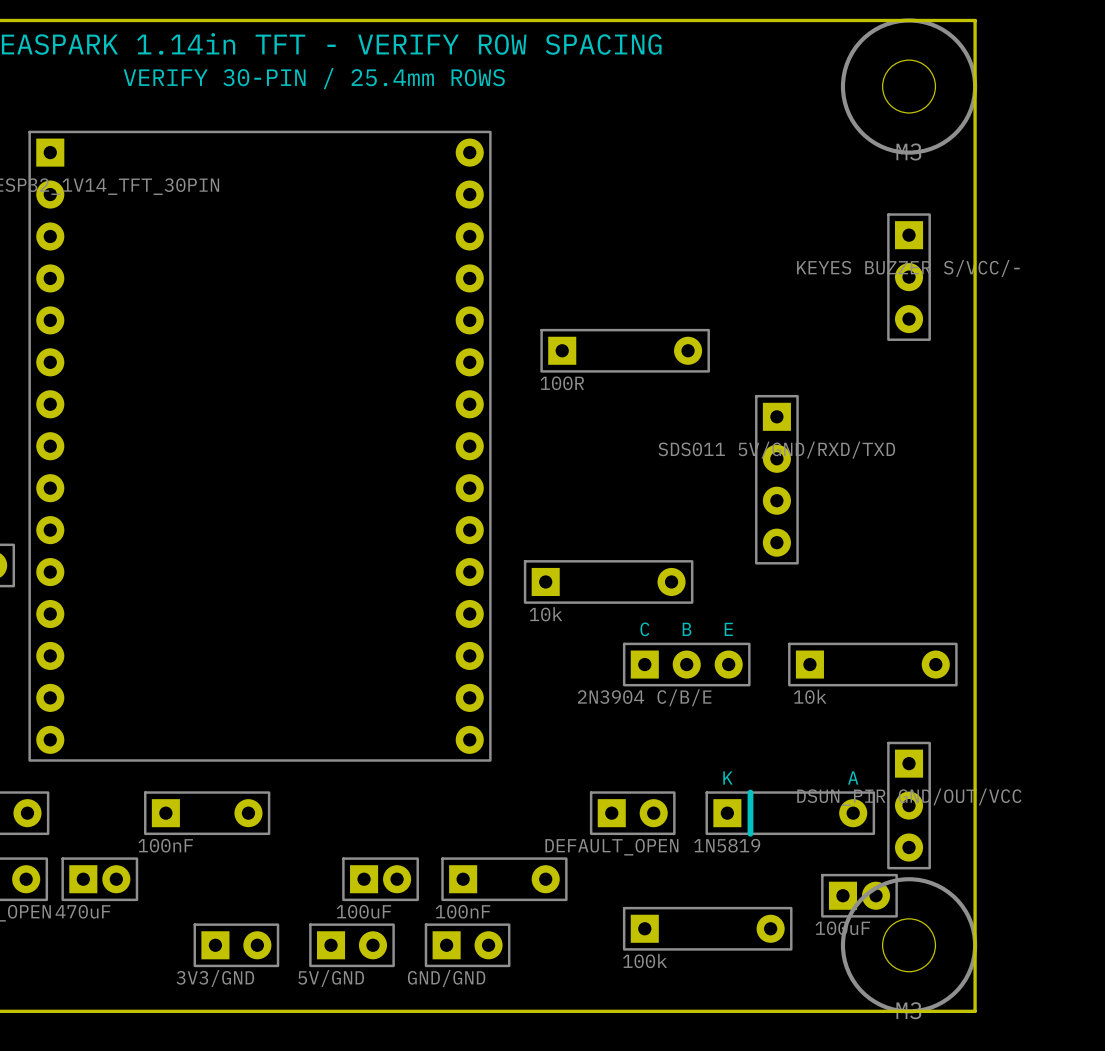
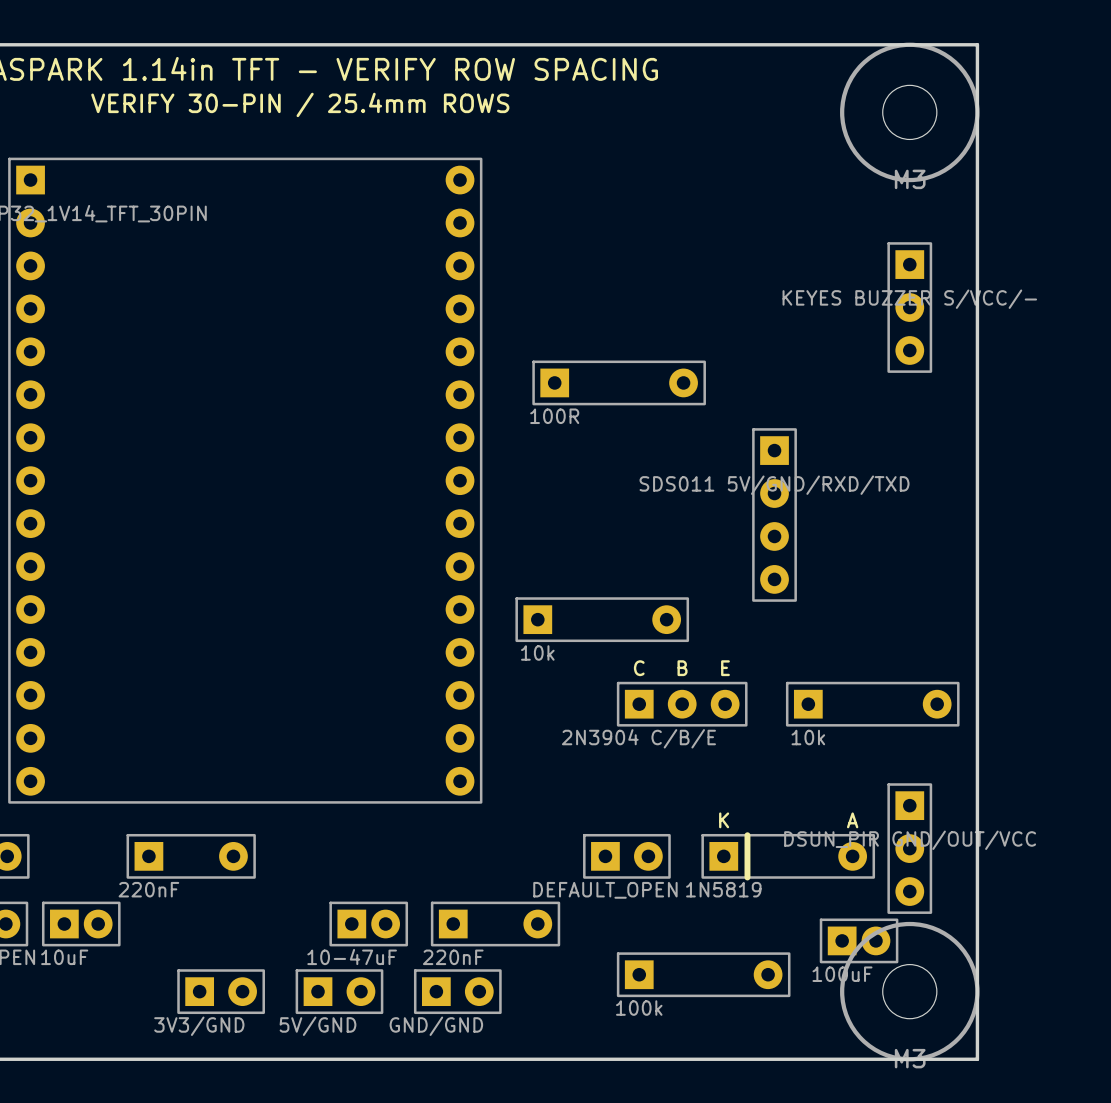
part value: 100nF (165, 845) -> 220nF (148, 889)
part value: 470uF (82, 911) -> 10uF (64, 957)
part value: 100uF (363, 911) -> 10-47uF (352, 956)
part value: 100nF (462, 911) -> 220nF (453, 957)

